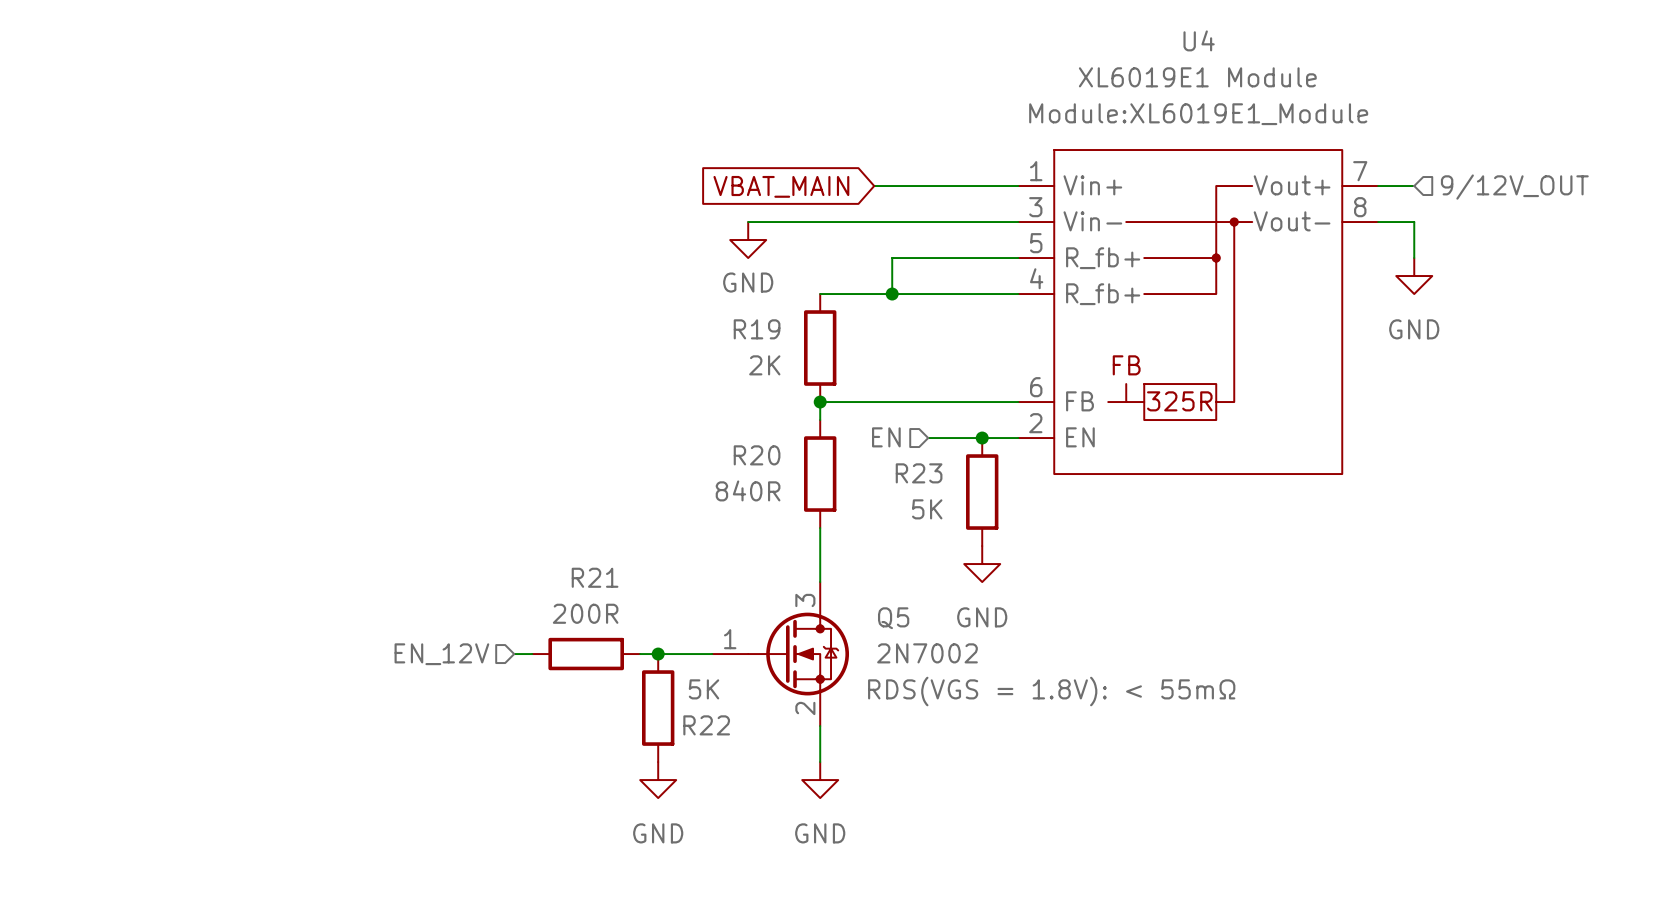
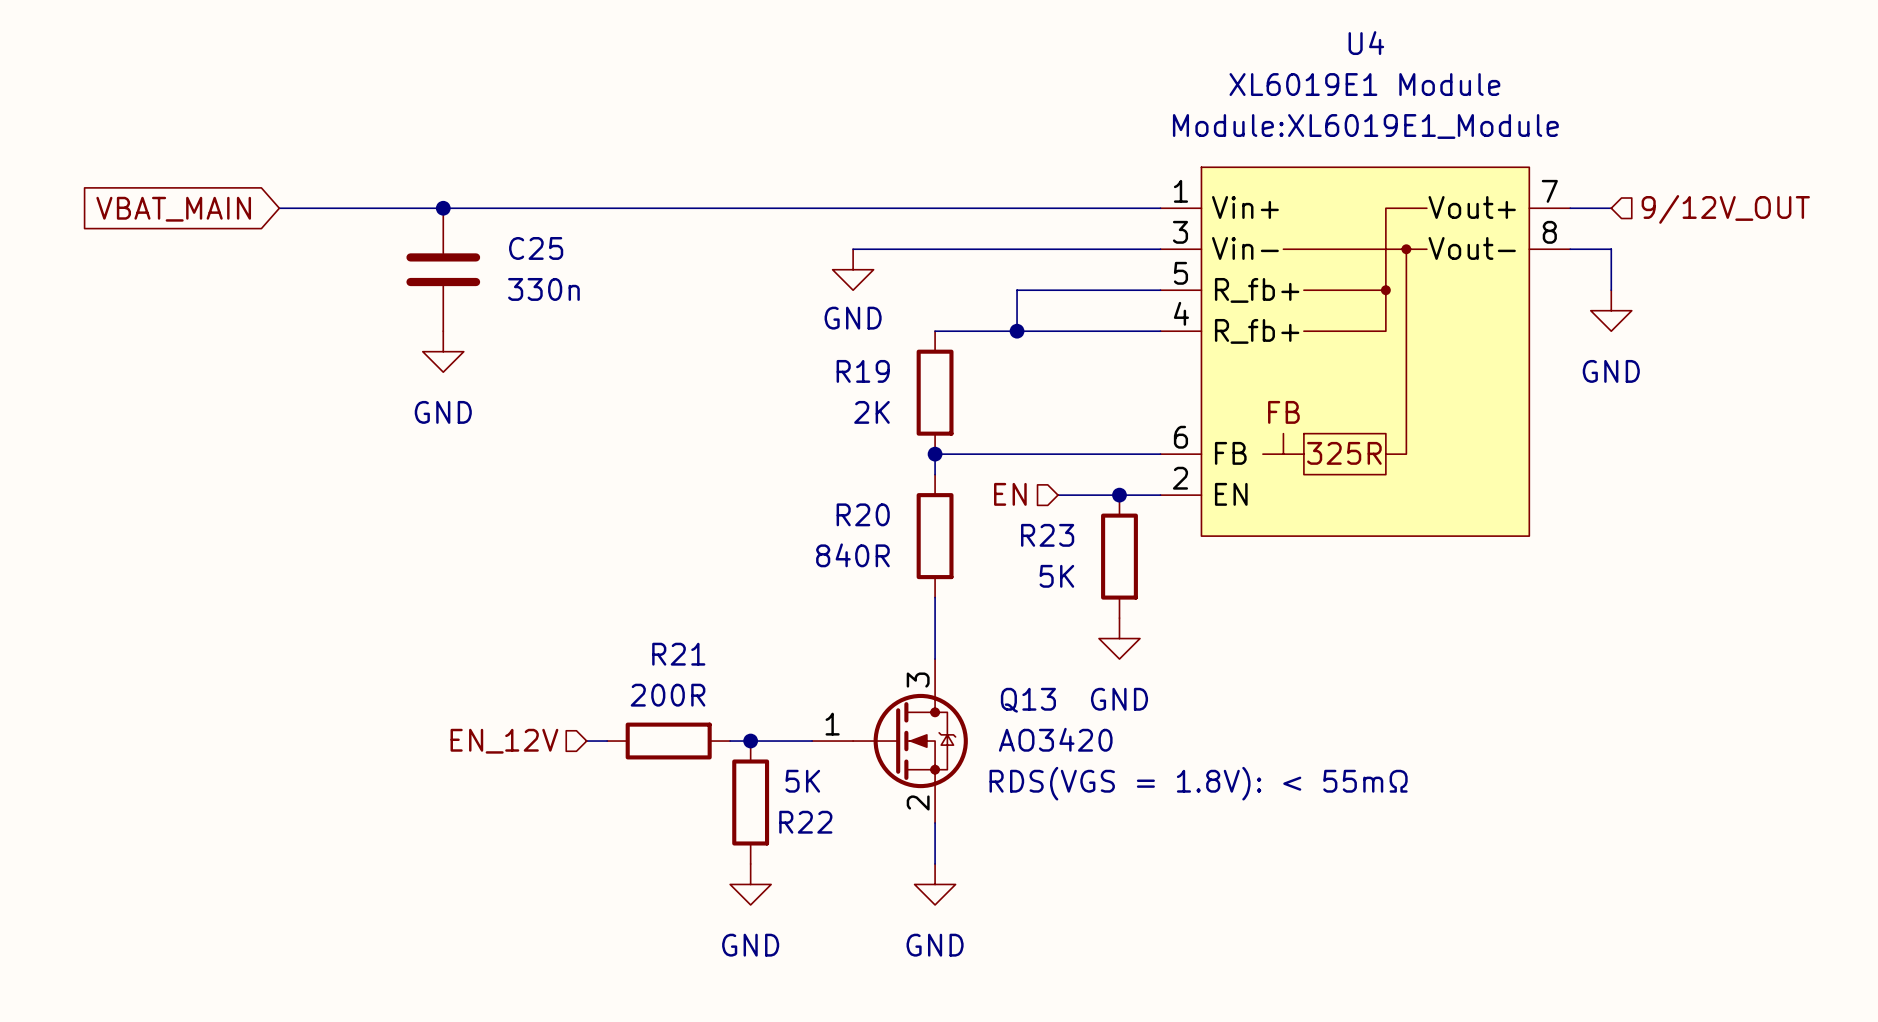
global label: none -> VBAT_MAIN (173, 209)
wire: none -> (279, 208) (996, 208)
junction: none -> (443, 208)
global label: VBAT_MAIN (781, 186) -> none
C25: none -> 330n (443, 269)
power symbol: none -> GND (443, 351)
Q5 name: Q5 (893, 618) -> Q13 (1028, 700)
Q5 value: 2N7002 (927, 653) -> AO3420 (1055, 739)

